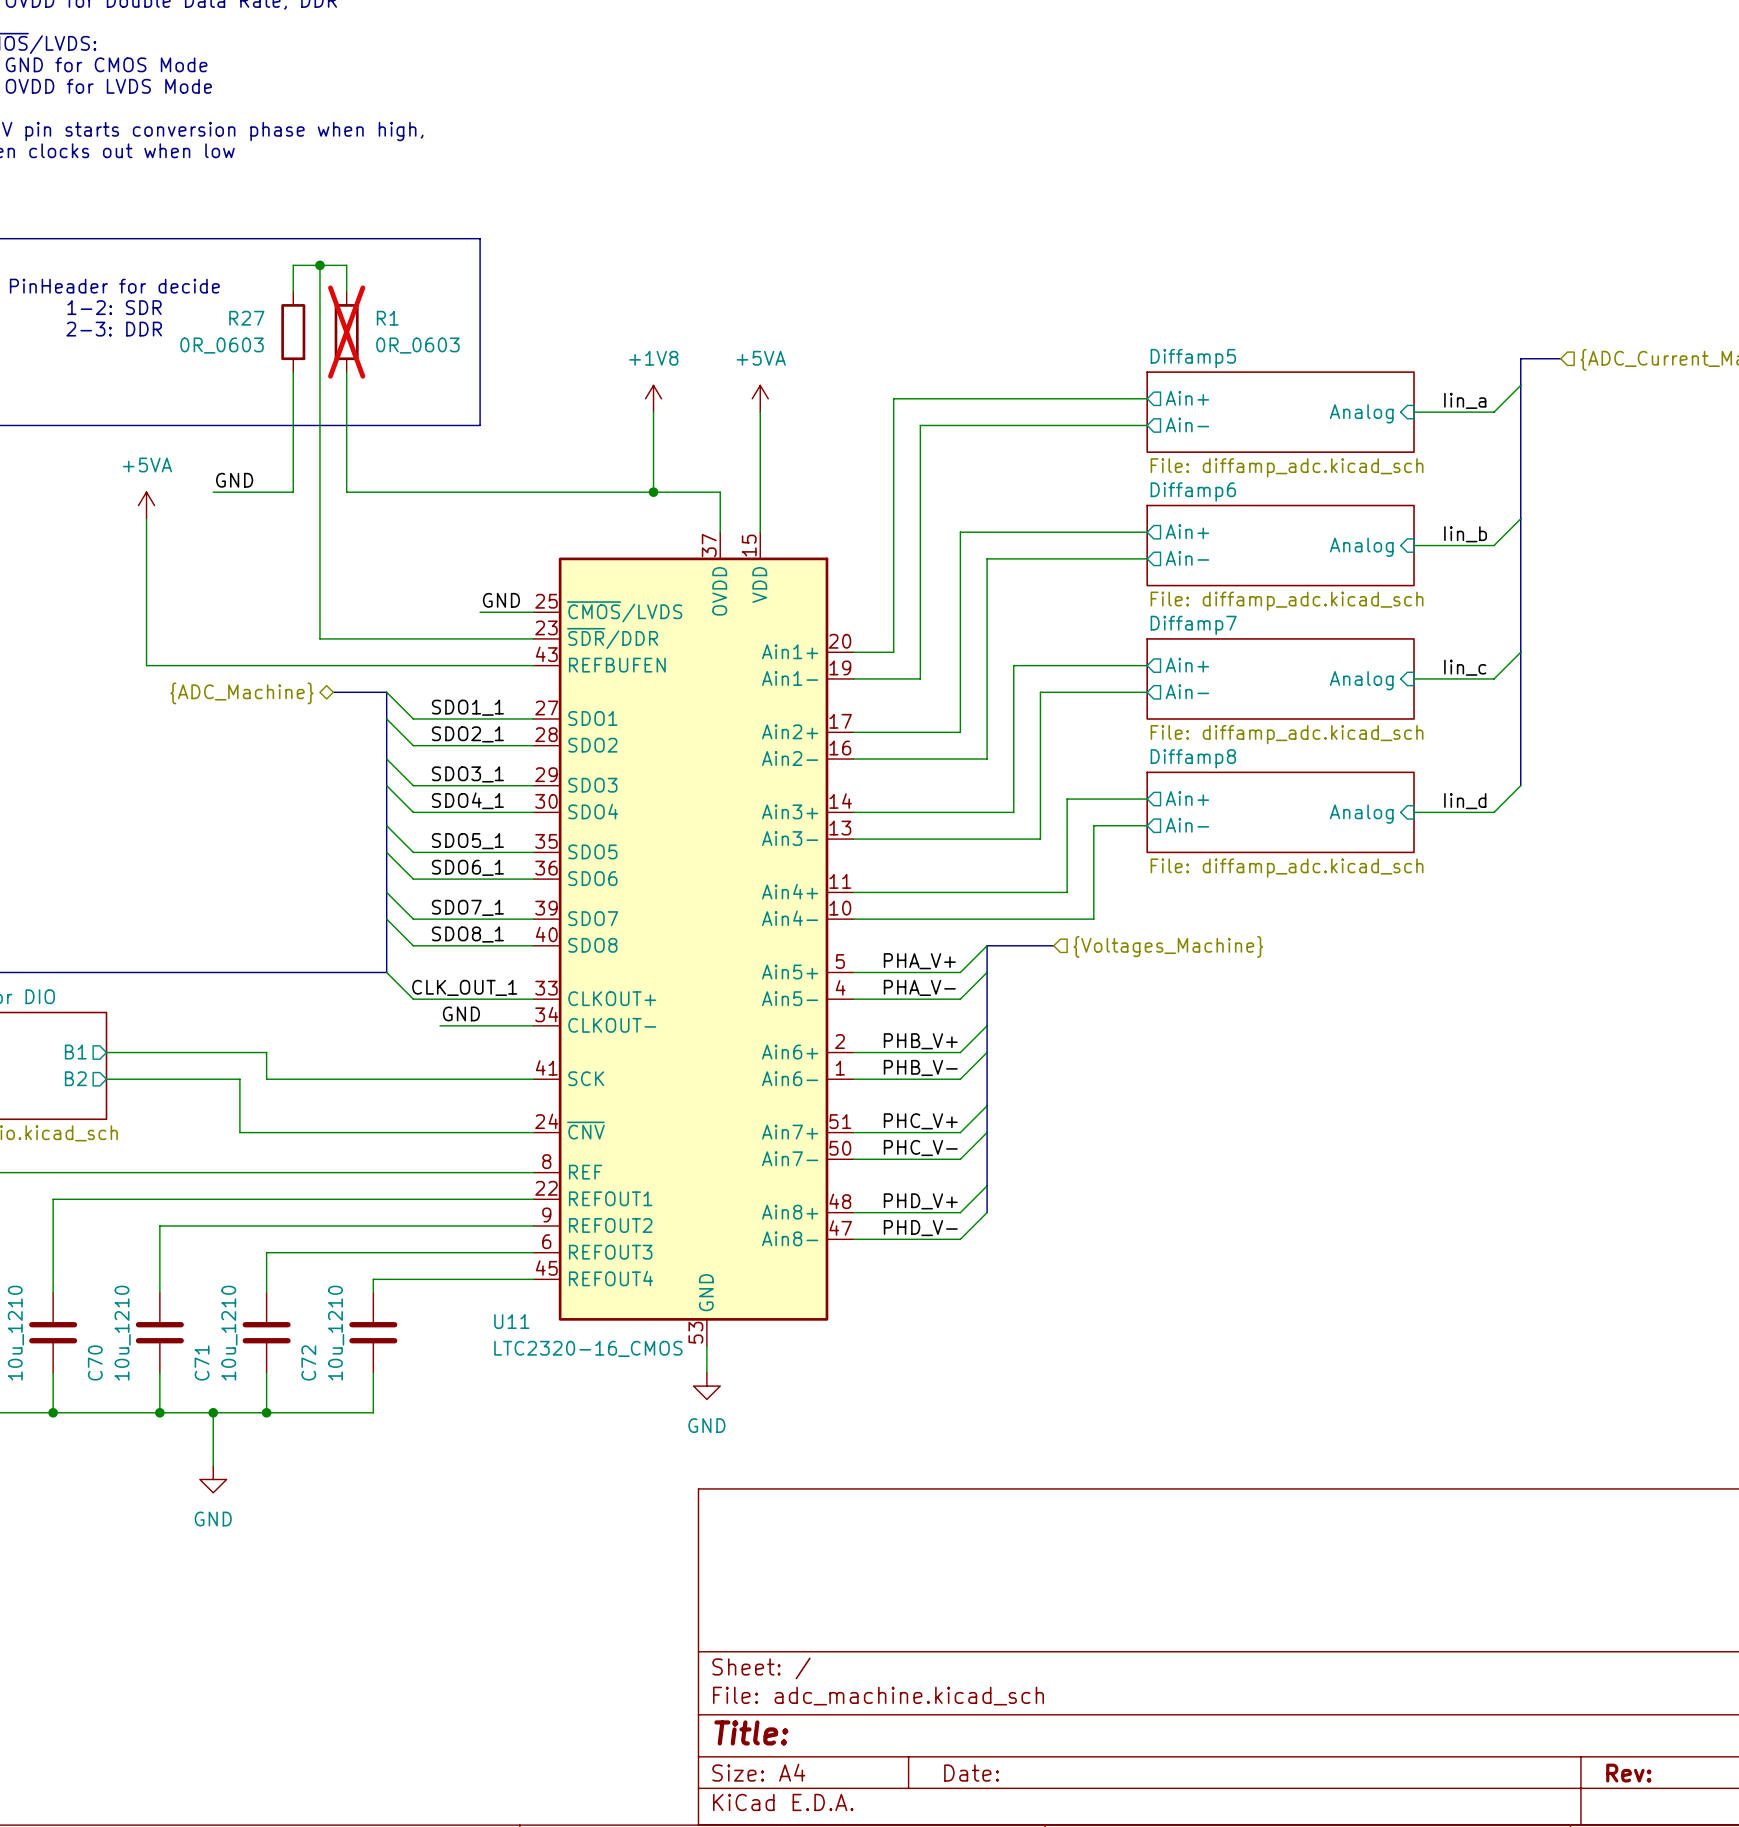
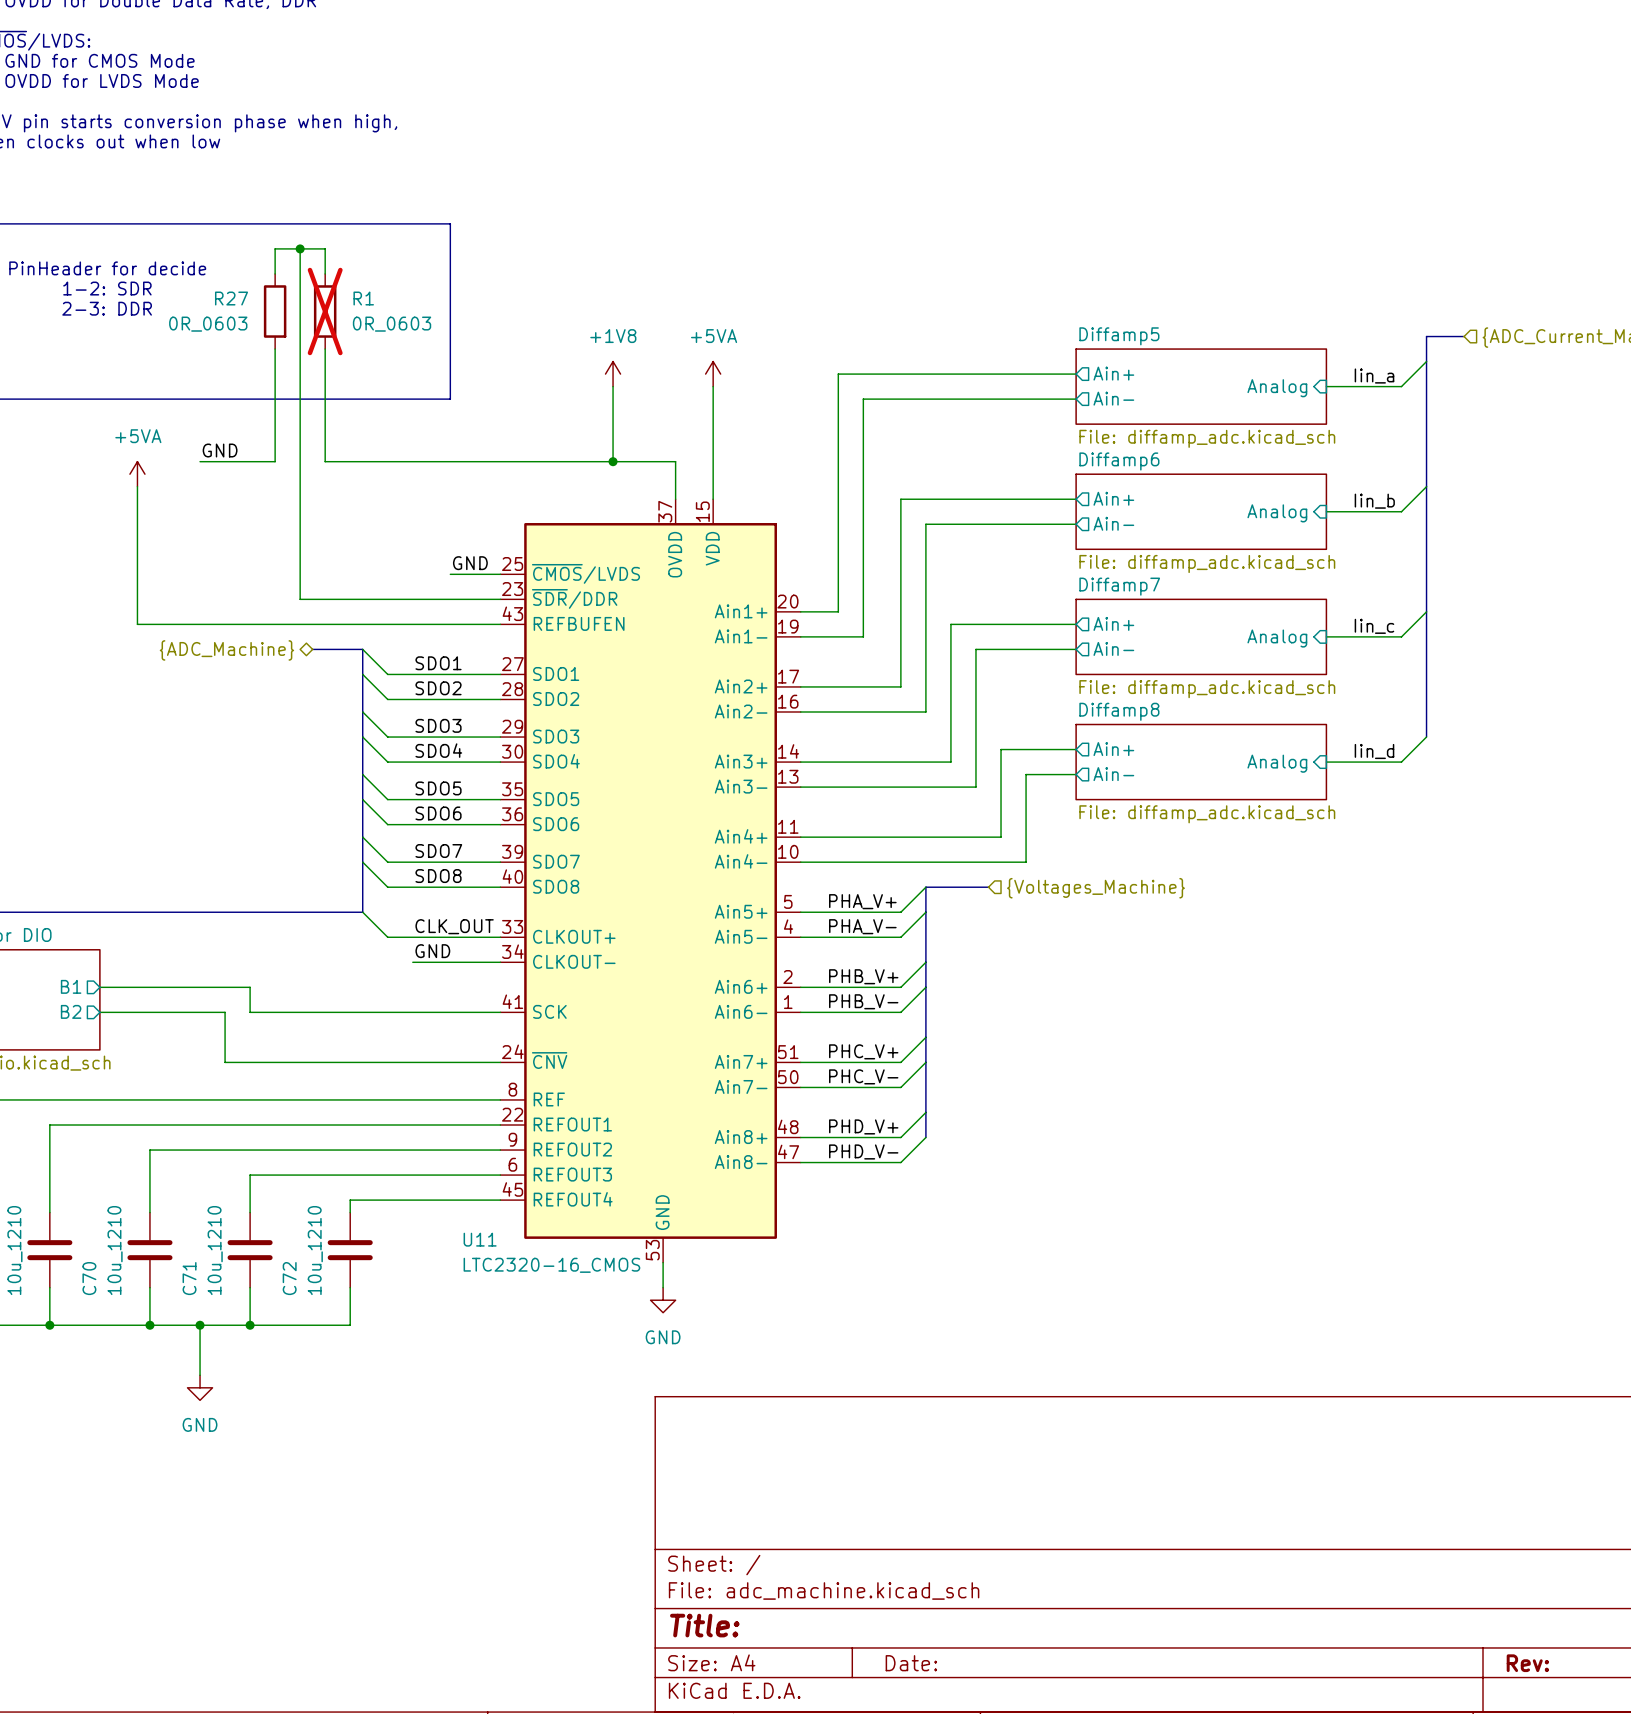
label: SDO1_1 (467, 707) -> none
label: none -> SDO1 (438, 663)
label: none -> SDO2 (438, 688)
label: SDO2_1 (467, 734) -> none
label: SDO3_1 (467, 774) -> SDO3 (438, 725)
label: SDO4_1 (467, 800) -> SDO4 (438, 750)
label: SDO5_1 (467, 841) -> SDO5 (438, 788)
label: SDO6_1 (467, 867) -> SDO6 (438, 813)
label: SDO7_1 (467, 907) -> SDO7 (438, 851)
label: SDO8_1 (467, 934) -> SDO8 (438, 876)
label: CLK_OUT_1 (464, 987) -> CLK_OUT (454, 926)

